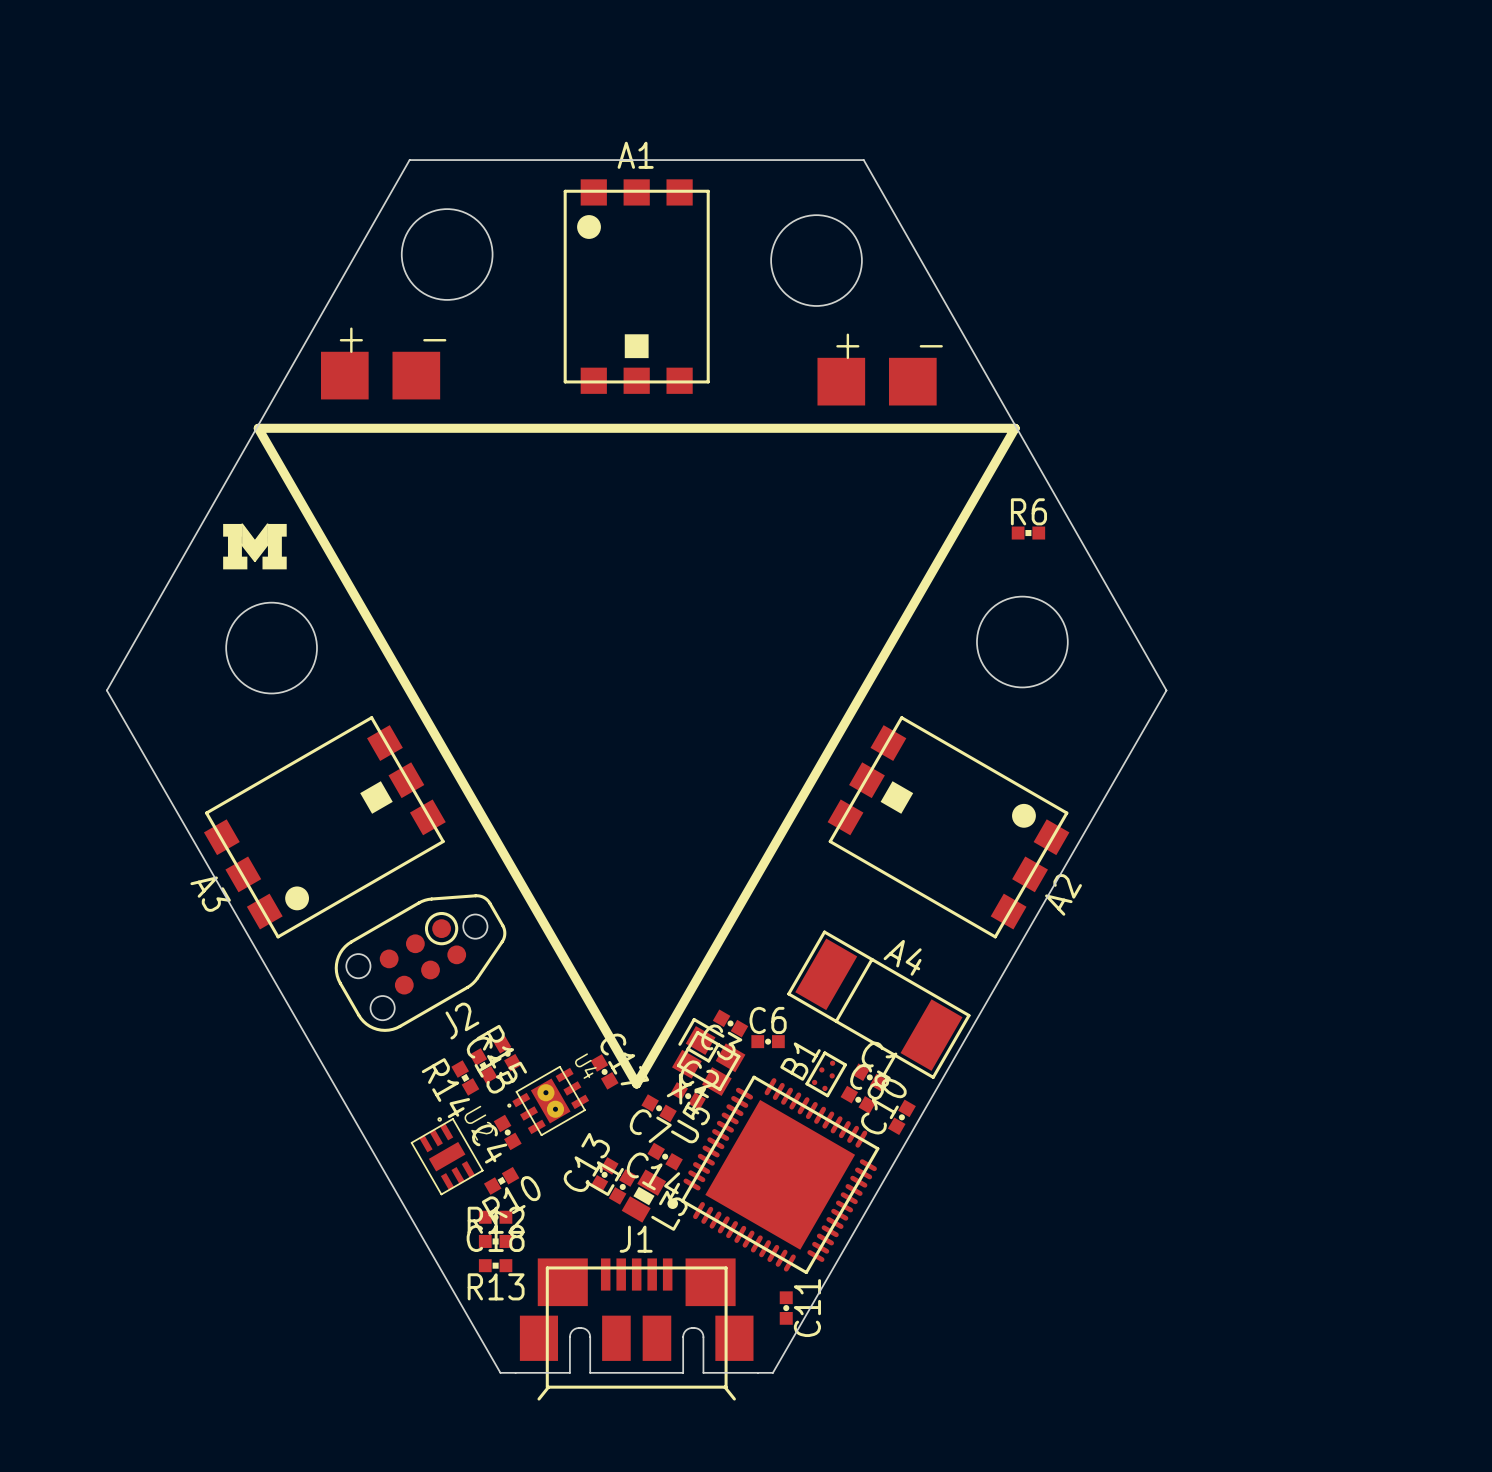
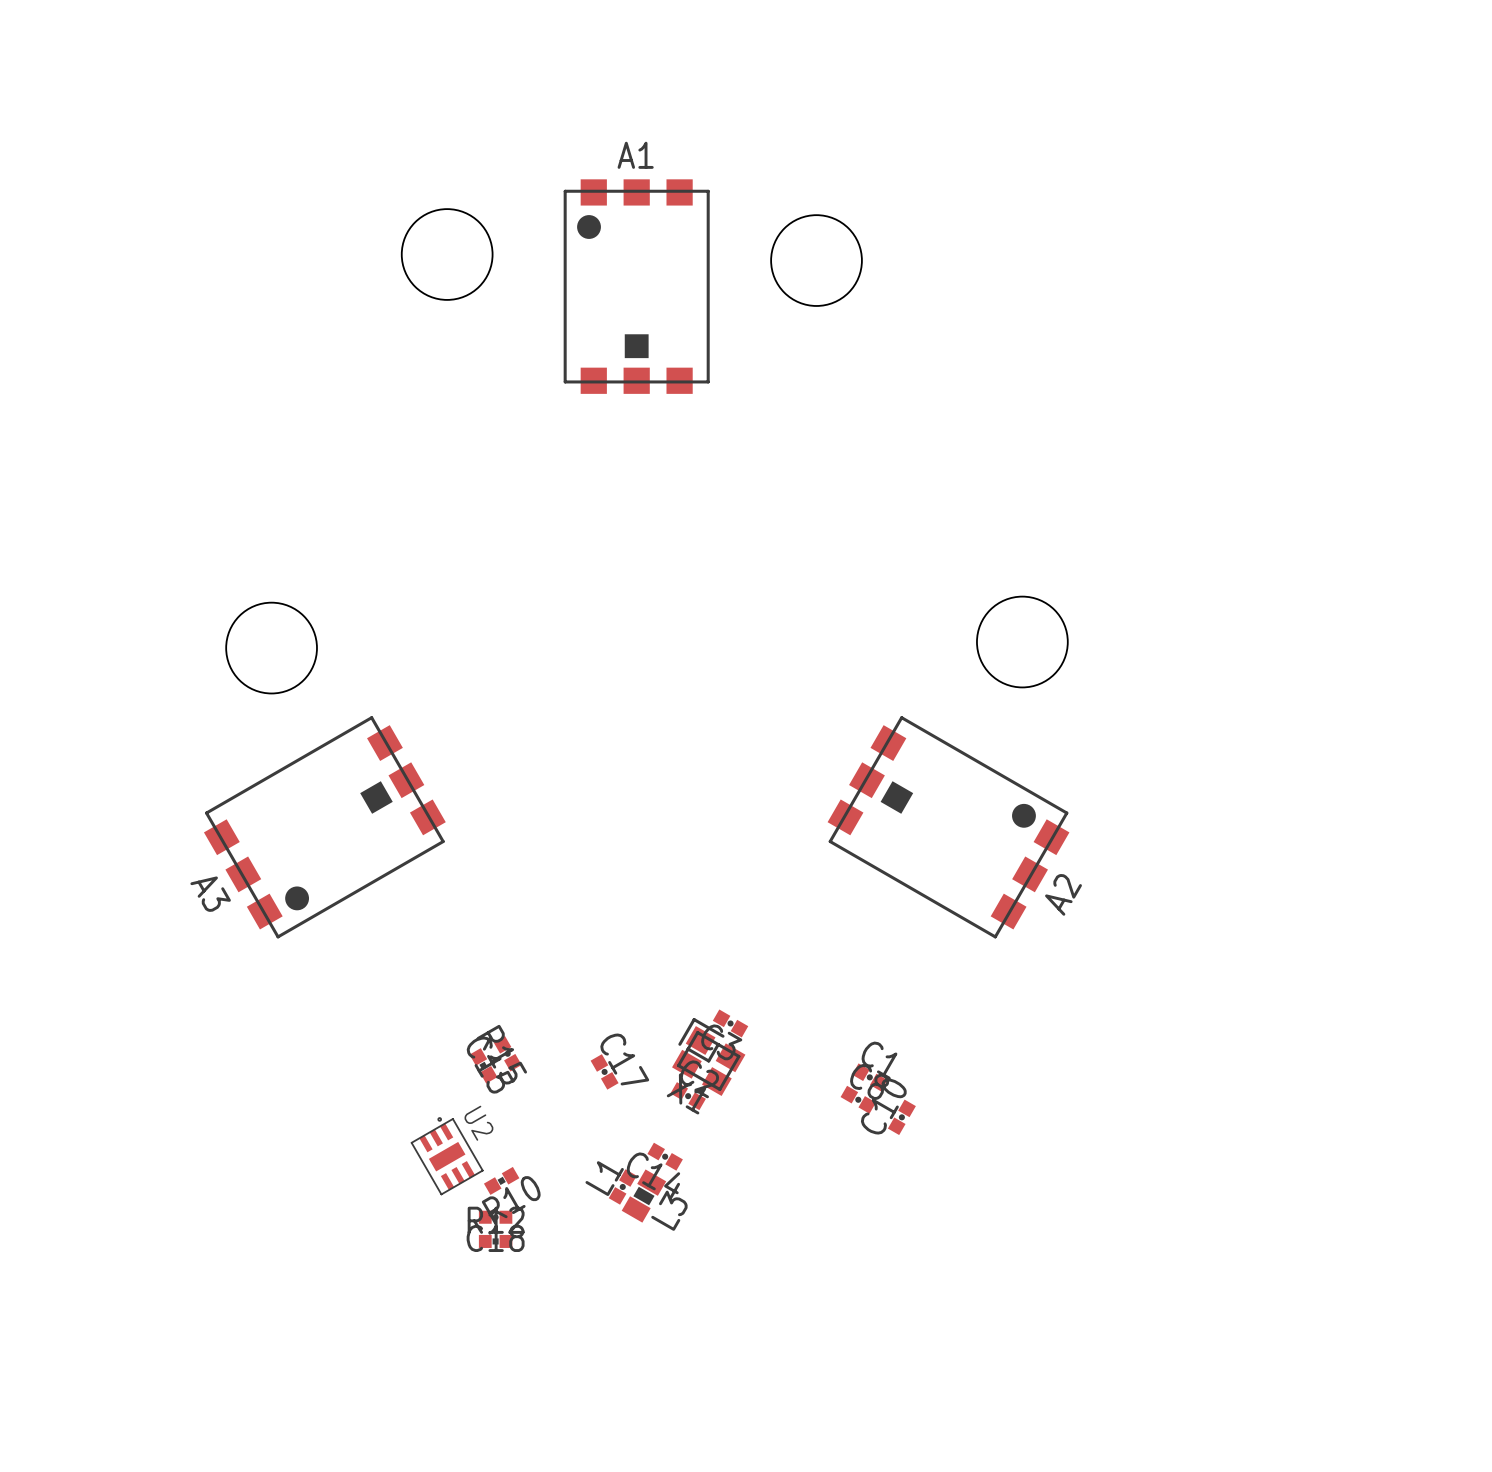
part: (380, 375) -> none
part: (877, 381) -> none
line: (258, 428) (1015, 428) (636, 1084) (258, 428) -> none
drawing: [223, 523, 287, 570] -> none
R6: (1028, 533) -> none
J2: (420, 963) -> none
A4: (878, 1004) -> none
C6: (768, 1041) -> none
B1: (826, 1074) -> none
R14: (465, 1077) -> none
U4: (548, 1100) -> none
C7: (659, 1108) -> none
C4: (507, 1132) -> none
C13: (604, 1174) -> none
U5: (773, 1174) -> none
R13: (495, 1265) -> none
C11: (786, 1308) -> none
J1: (636, 1329) -> none
board edge: (515, 1372) (500, 1372) (106, 690) (409, 160) (863, 160) (1166, 690) (772, 1372) (757, 1372) -> none

